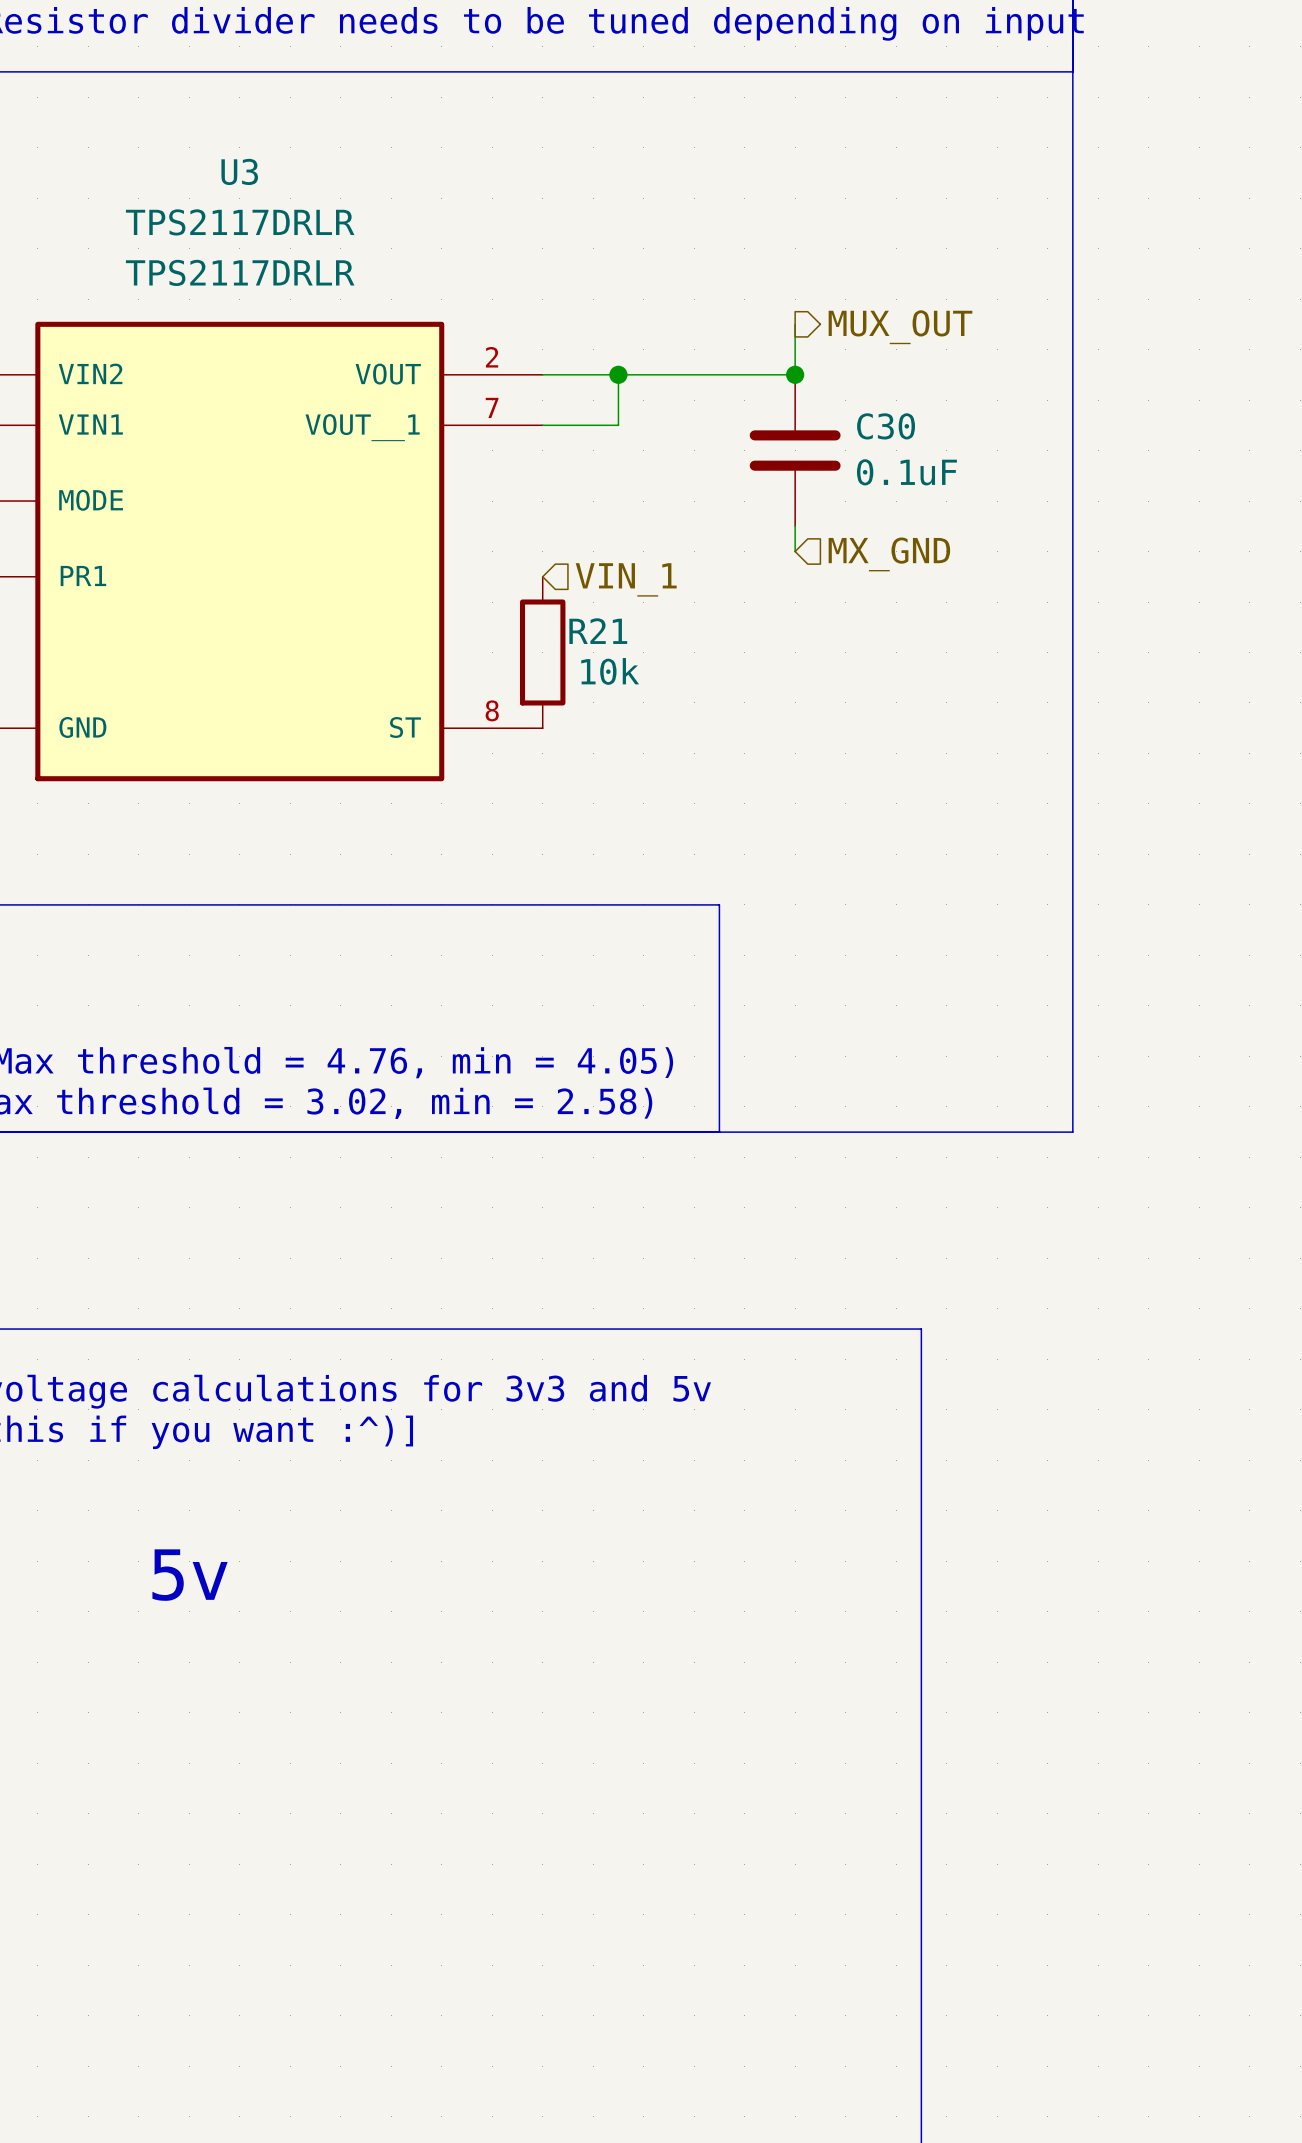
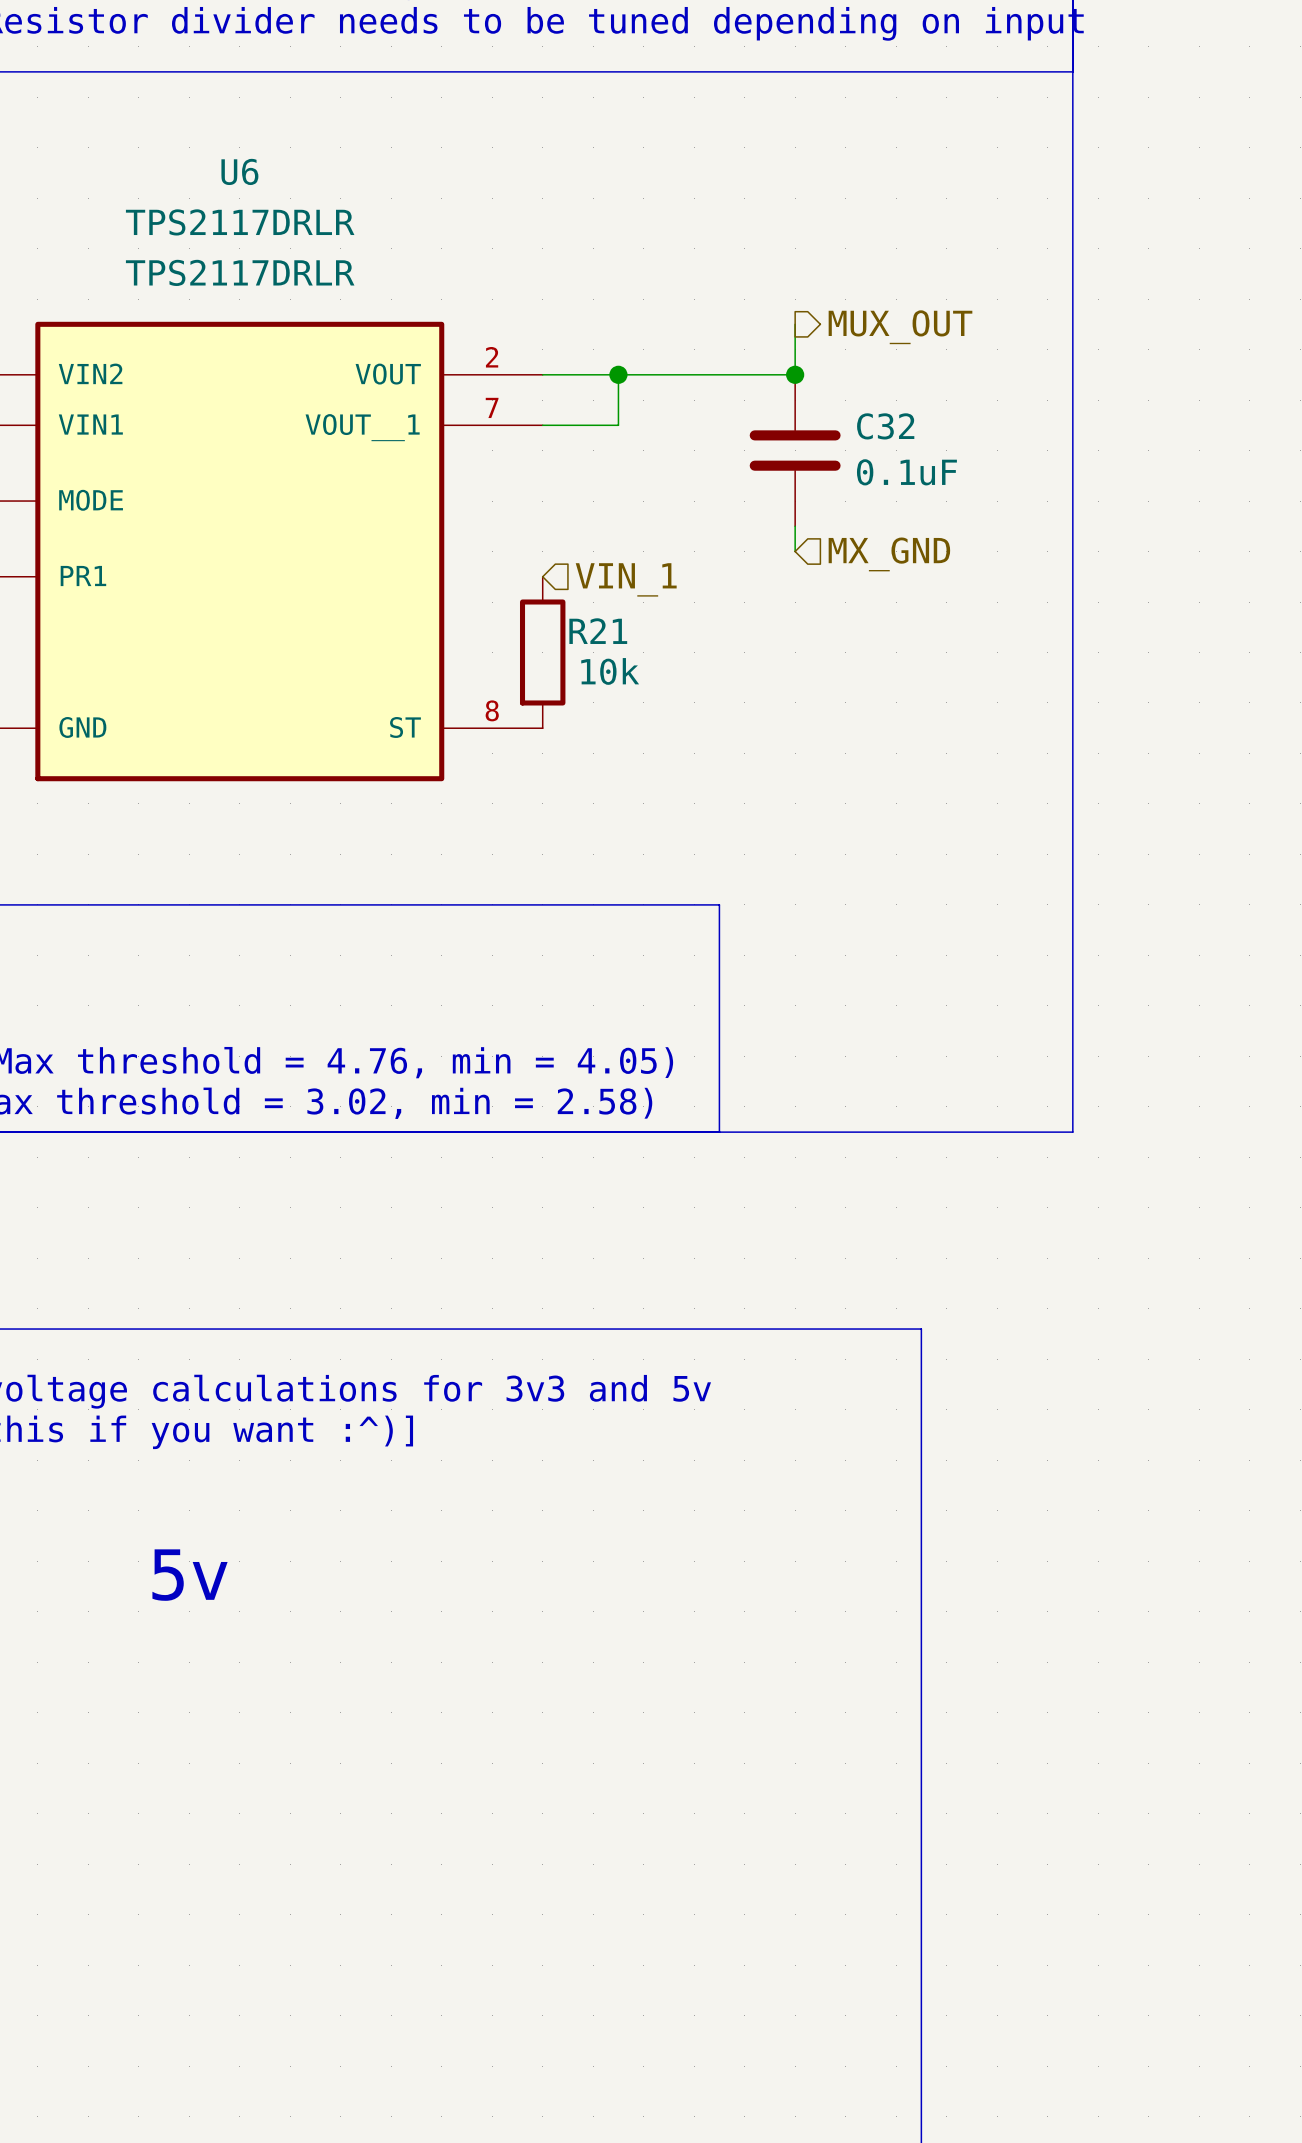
U3 name: U3 (239, 171) -> U6 (239, 171)
C30 name: C30 (886, 426) -> C32 (885, 426)

